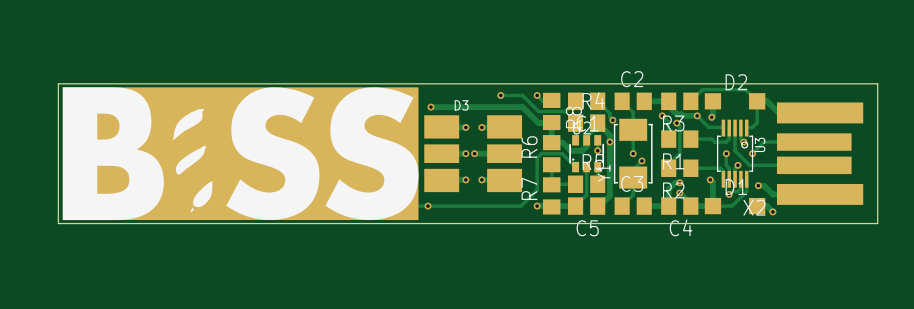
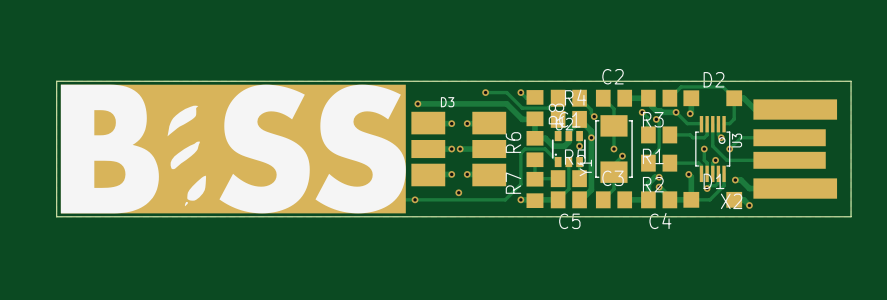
via: none -> (458, 192)

